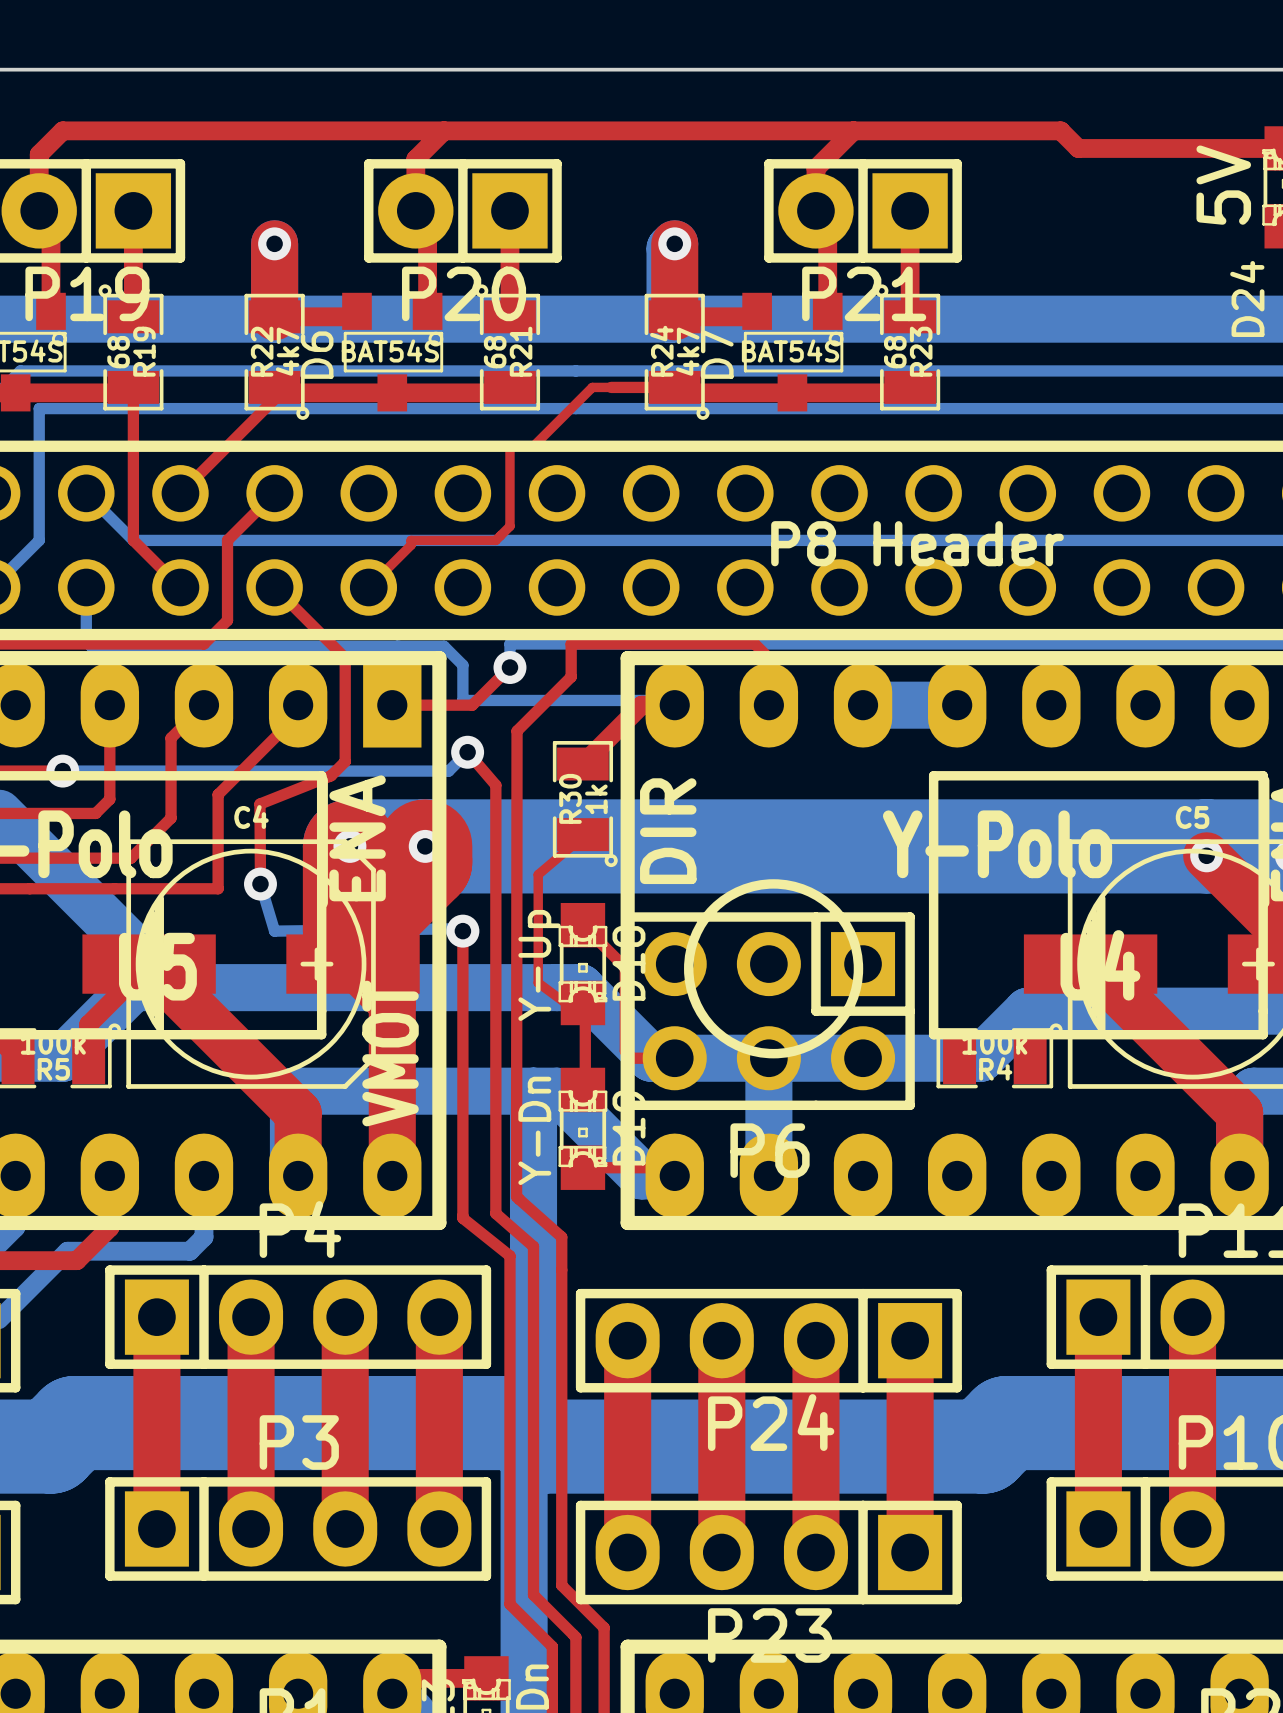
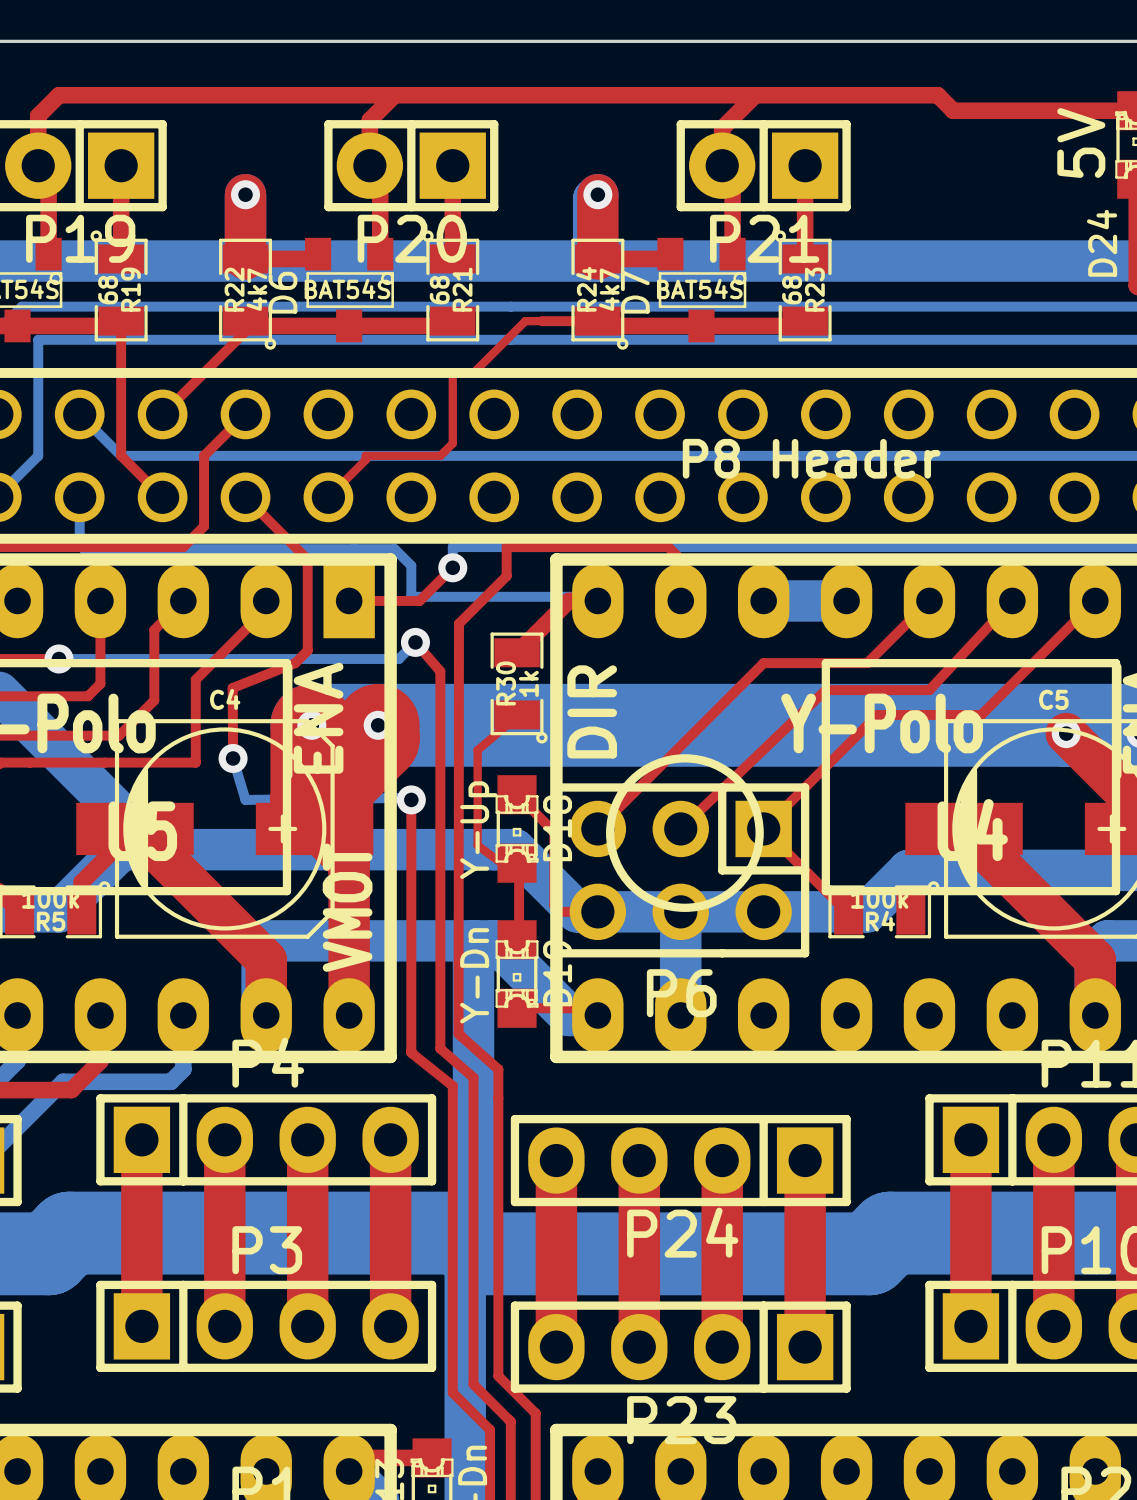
top track: none -> (929, 600) (867, 663) (763, 663) (597, 828)
top track: none -> (1012, 600) (929, 690) (825, 690) (680, 828)
top track: none -> (1095, 600) (981, 714) (877, 714) (763, 828) (848, 911)

